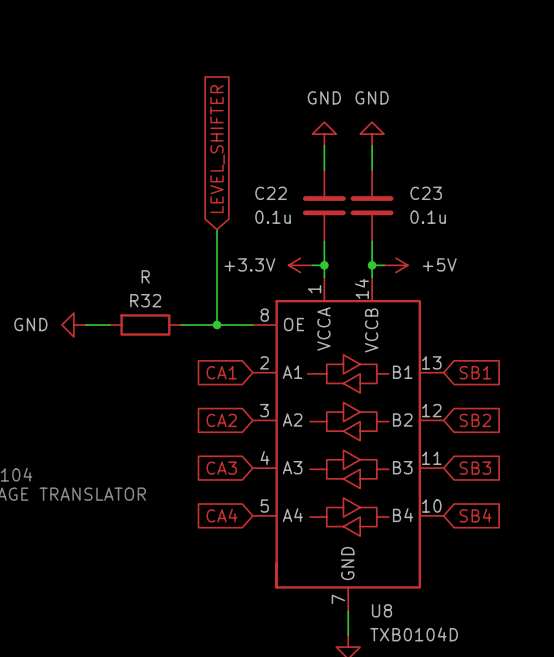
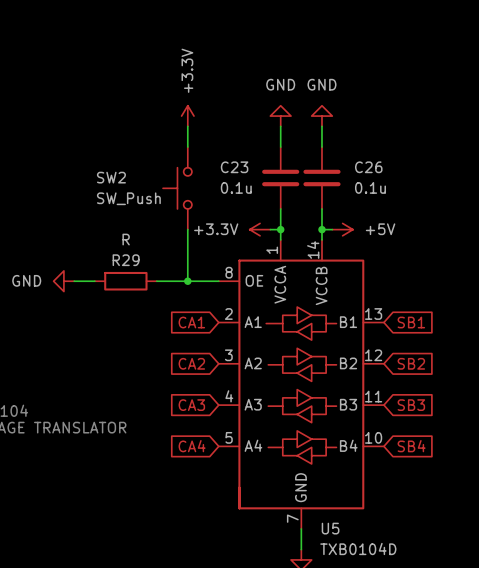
power symbol: none -> +3.3V (187, 116)
wire: none -> (187, 126) (187, 147)
global label: LEVEL_SHIFTER (217, 149) -> none
C22 name: C22 (271, 193) -> C23 (234, 167)
C23 name: C23 (426, 193) -> C26 (368, 167)
SW2: none -> SW_Push (177, 188)
R32 name: R32 (145, 300) -> R29 (126, 260)
U8 name: U8 (382, 610) -> U5 (330, 528)

